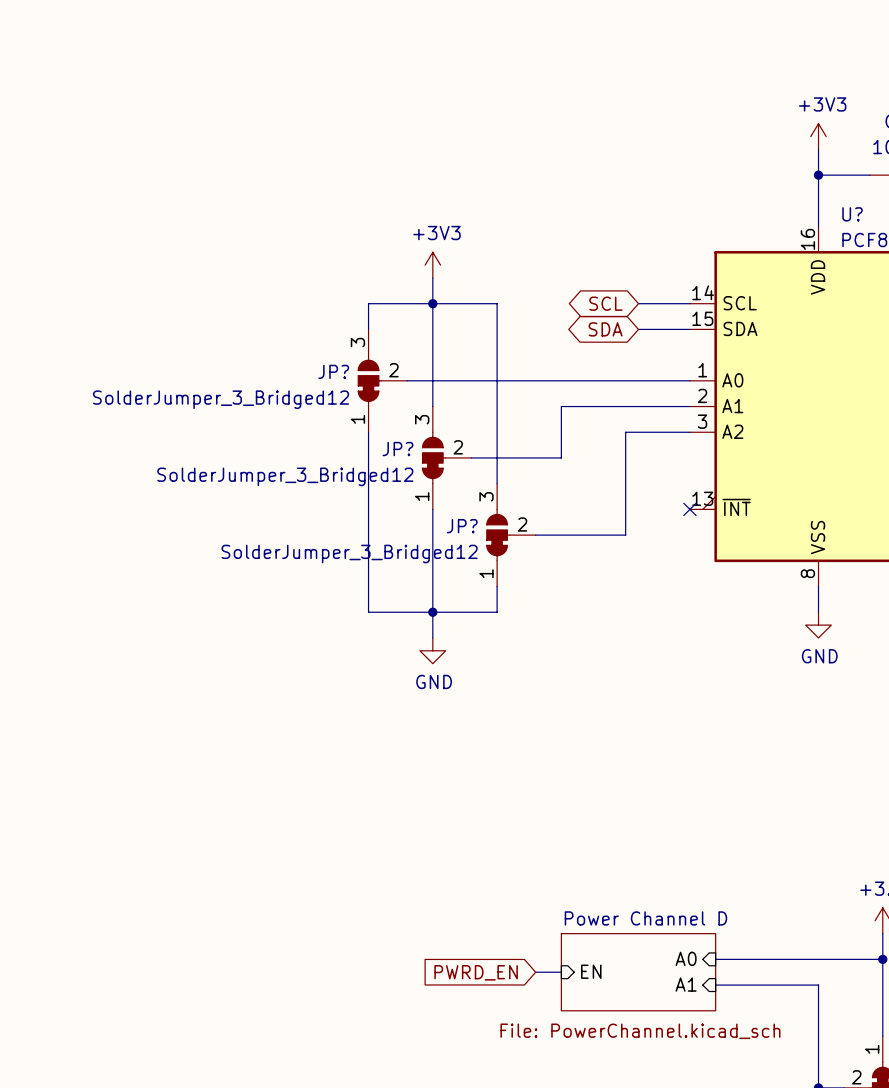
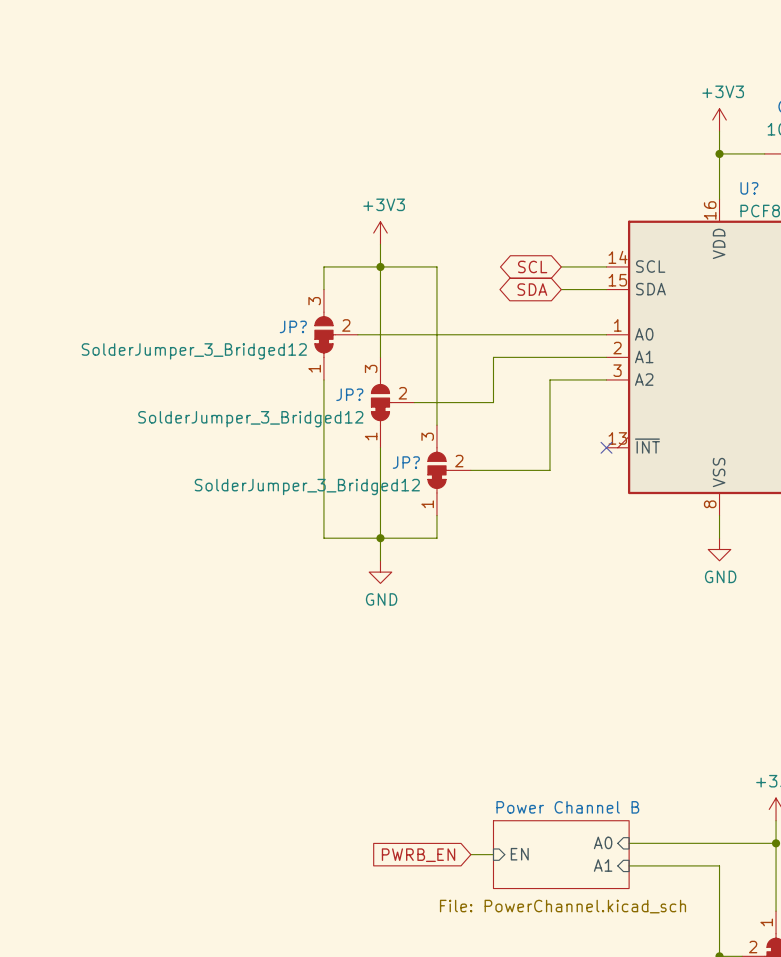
sheet Power Channel D name: Power Channel D (645, 918) -> Power Channel B (567, 807)
global label: PWRD_EN (476, 972) -> PWRB_EN (418, 855)

